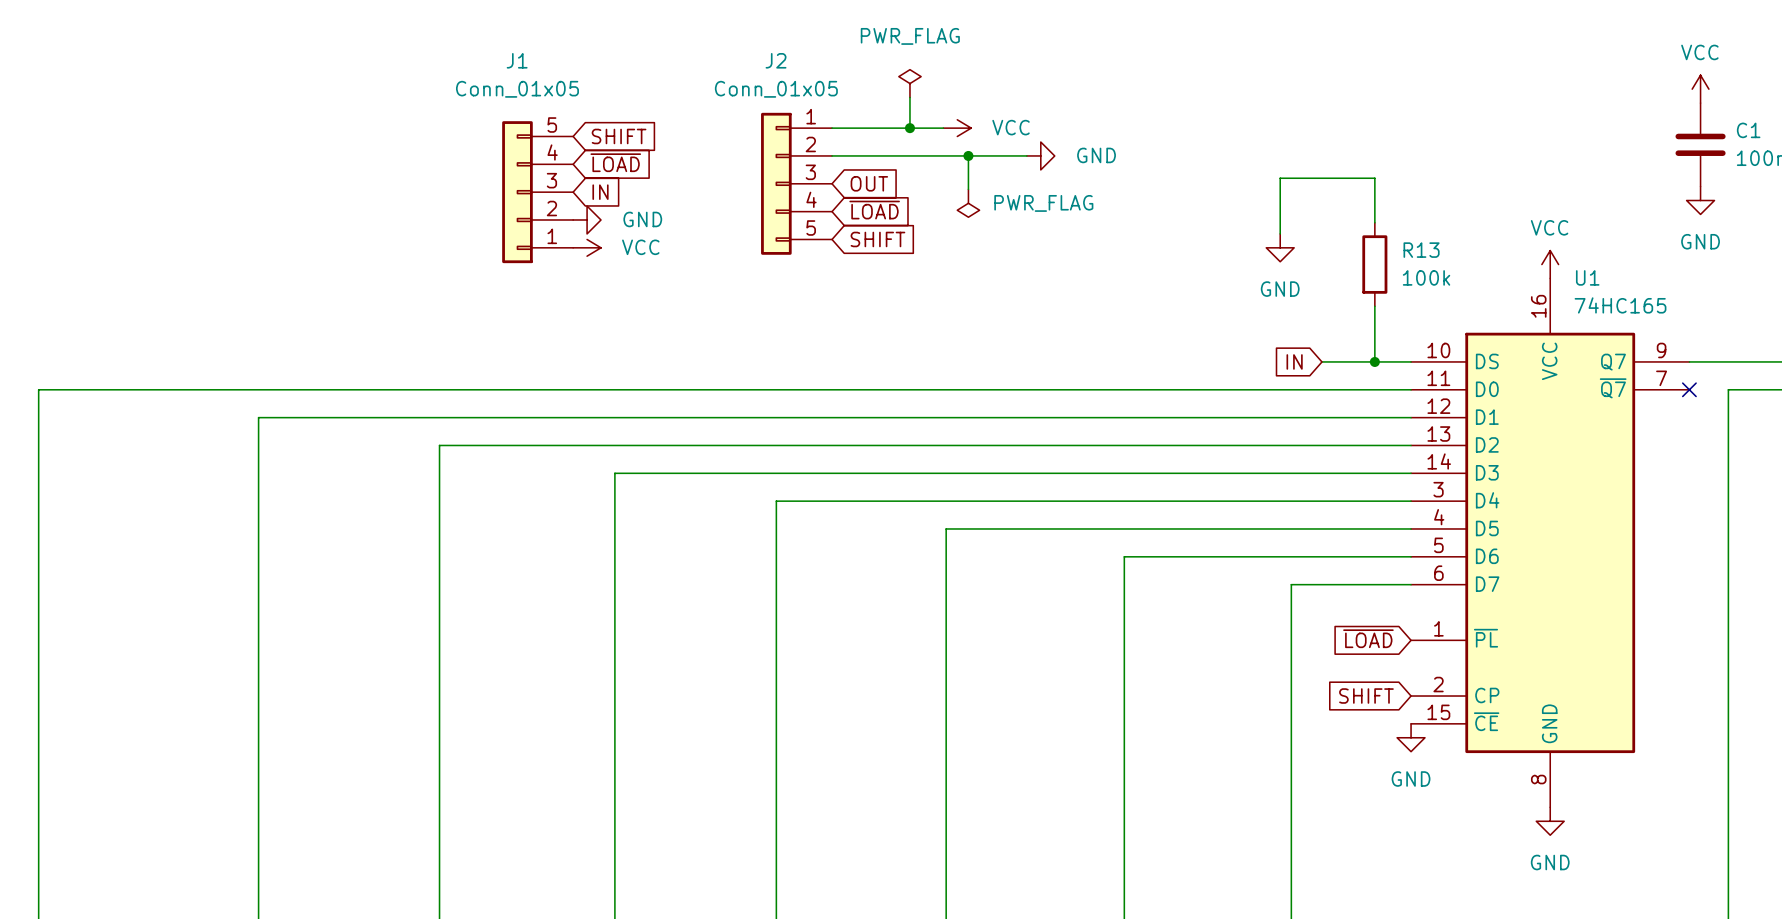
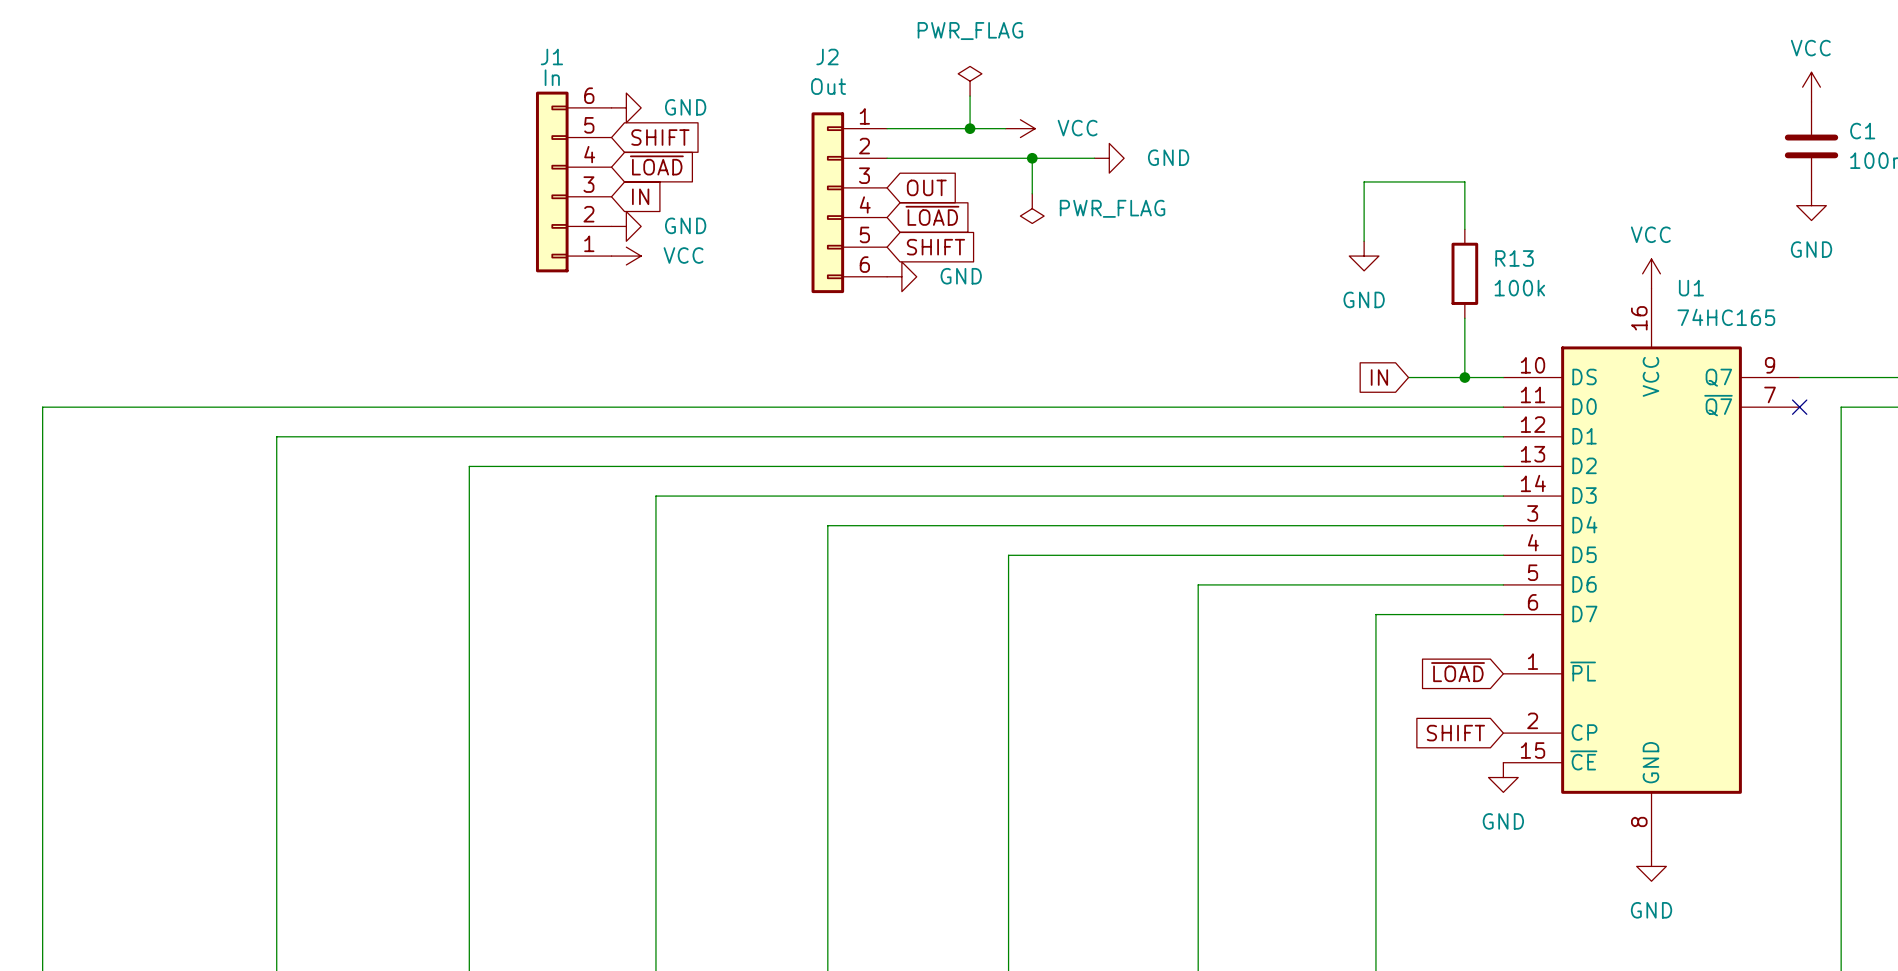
J1 value: Conn_01x05 (517, 89) -> In (552, 77)
J2 value: Conn_01x05 (776, 89) -> Out (828, 86)
power symbol: none -> GND (626, 107)
J2 symbol: [761, 112, 833, 255] -> [811, 112, 888, 294]
J1 symbol: [502, 121, 574, 264] -> [535, 91, 612, 273]
power symbol: none -> GND (901, 276)

